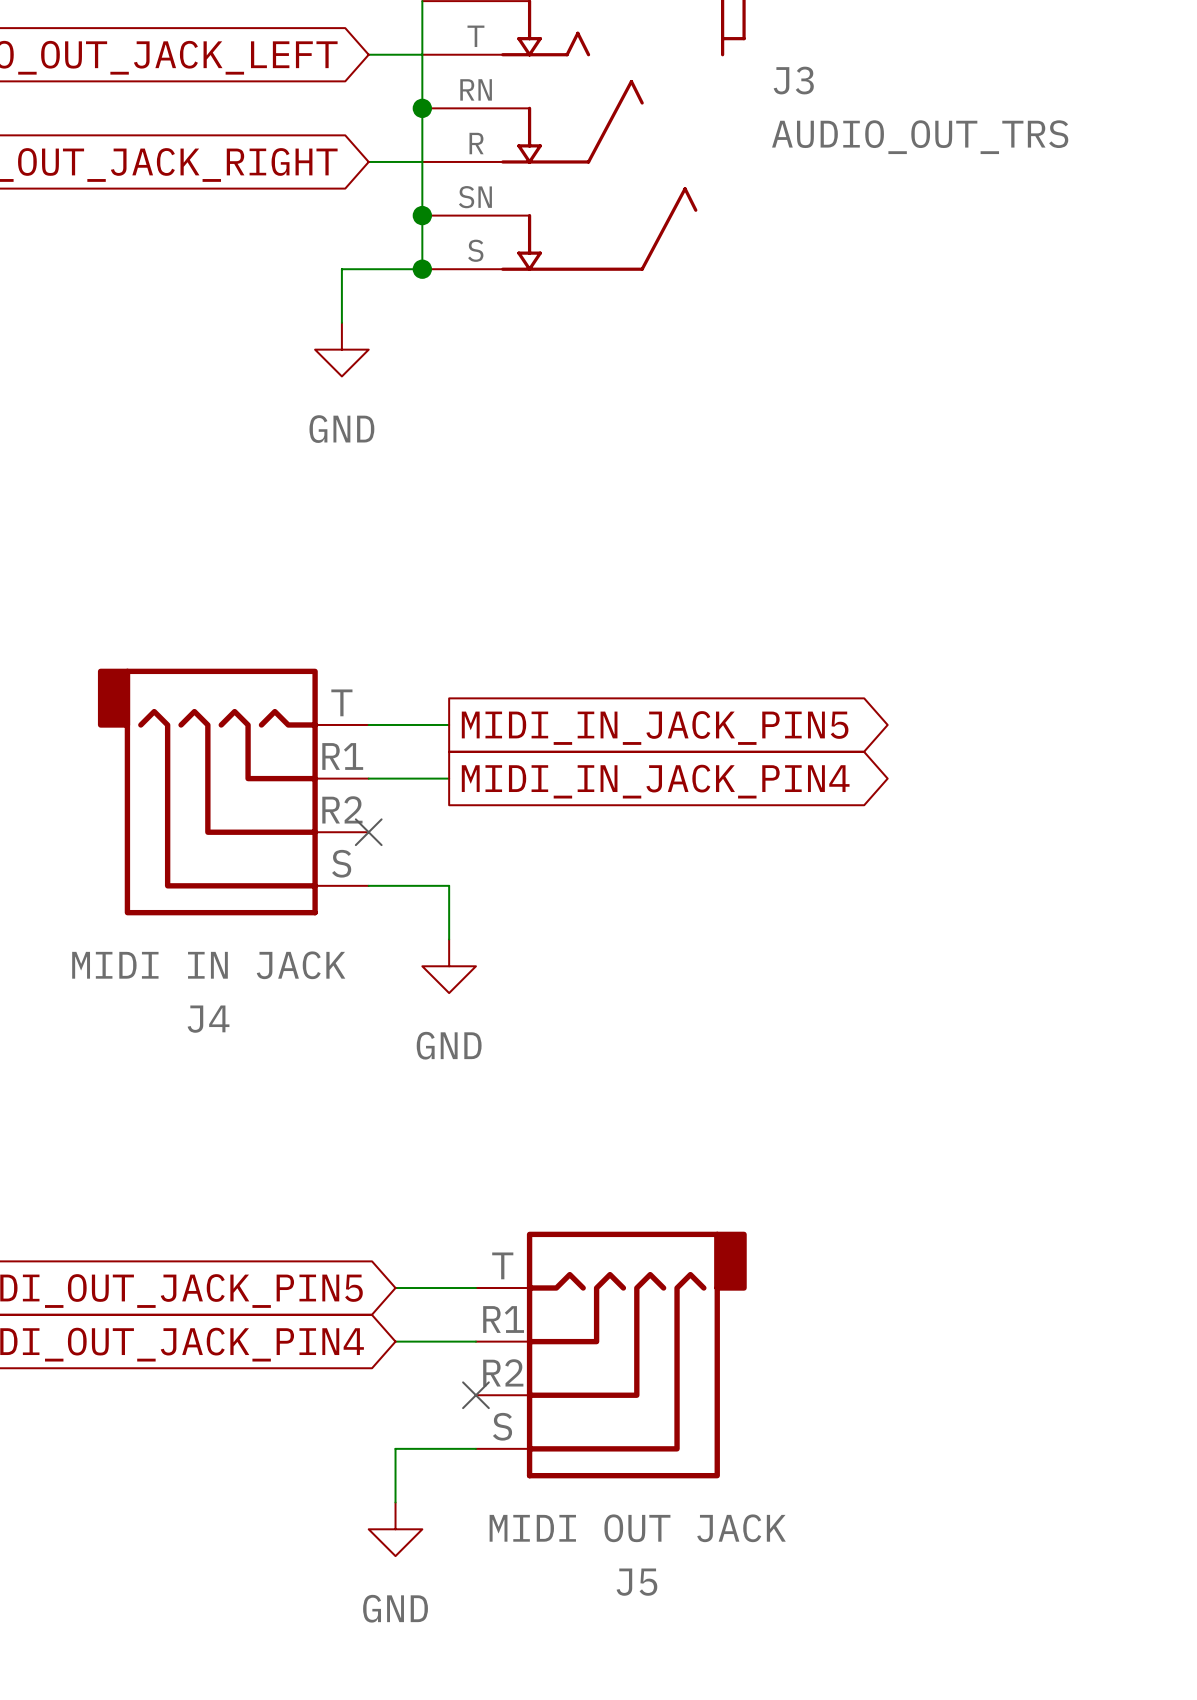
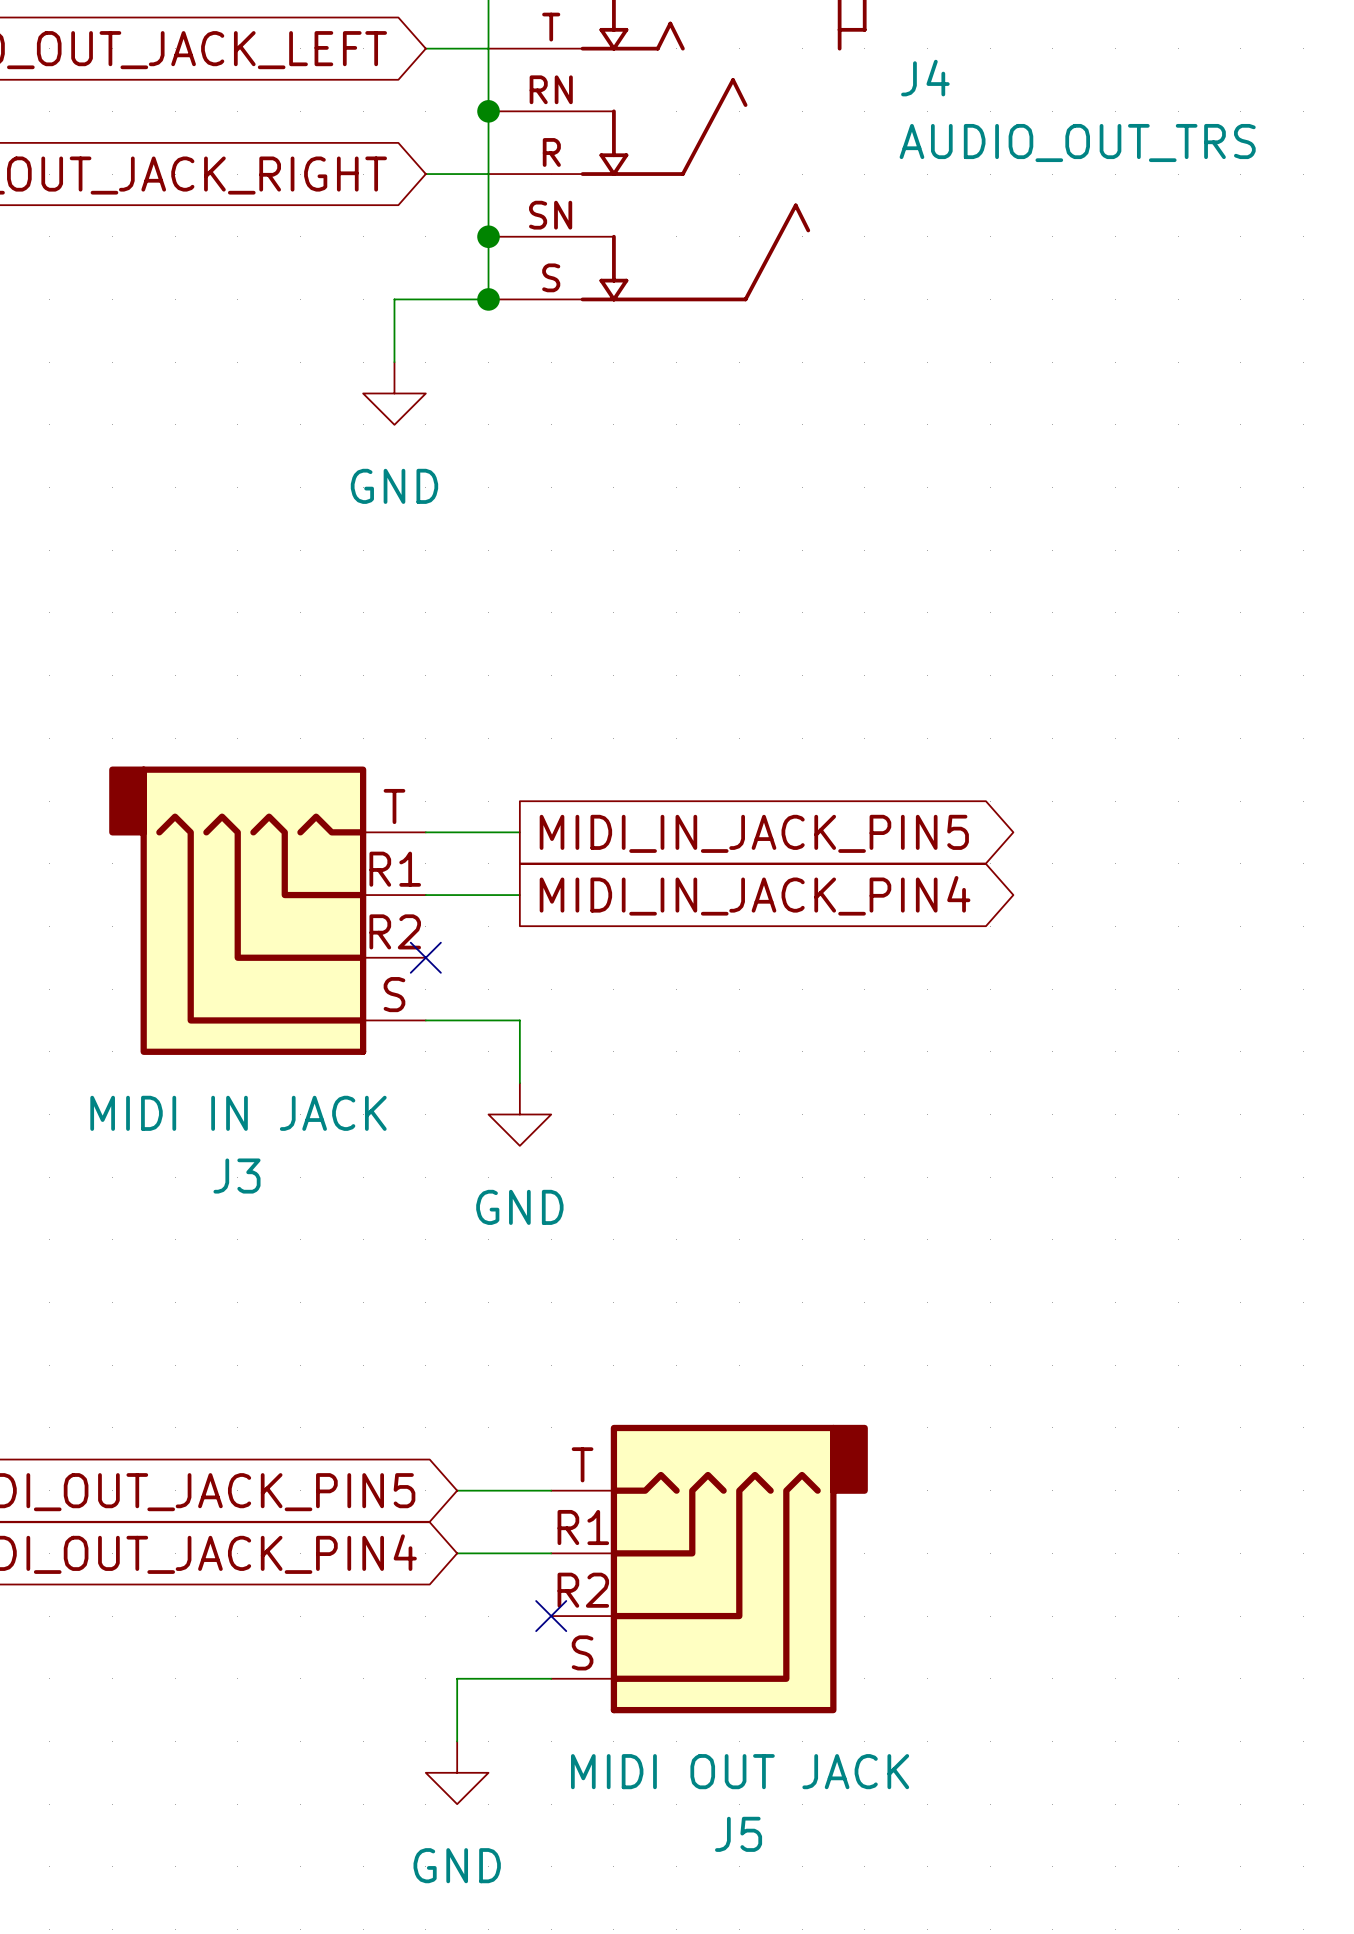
J3 name: J3 (793, 80) -> J4 (925, 78)
J4 name: J4 (208, 1019) -> J3 (236, 1176)

